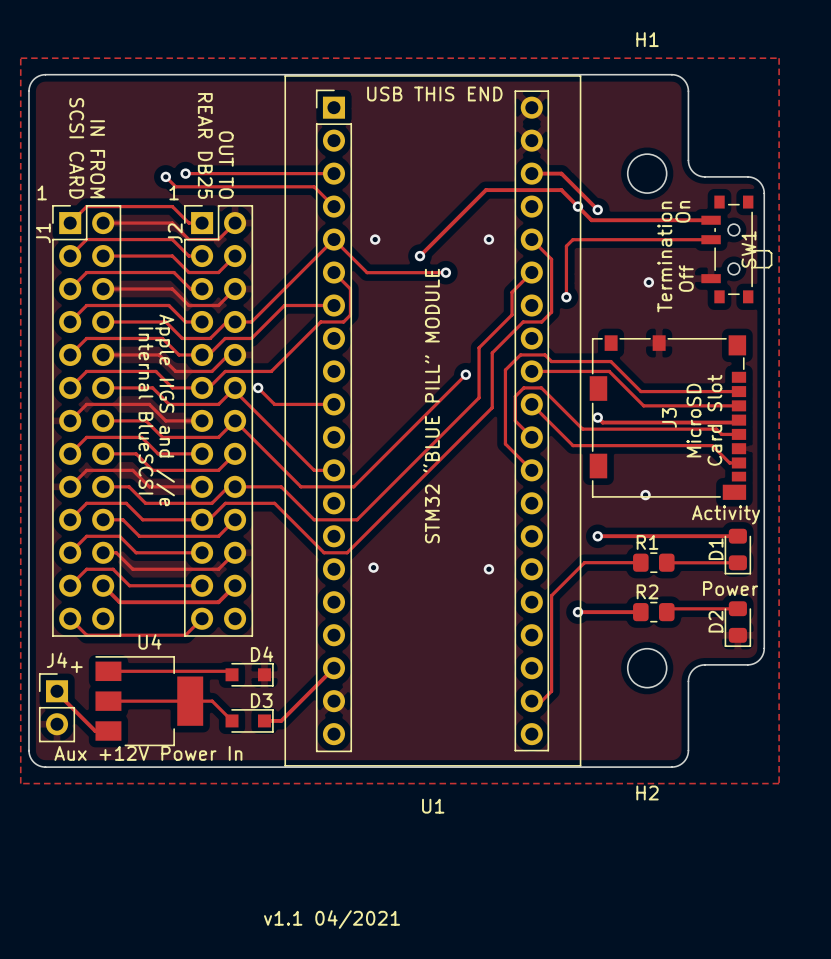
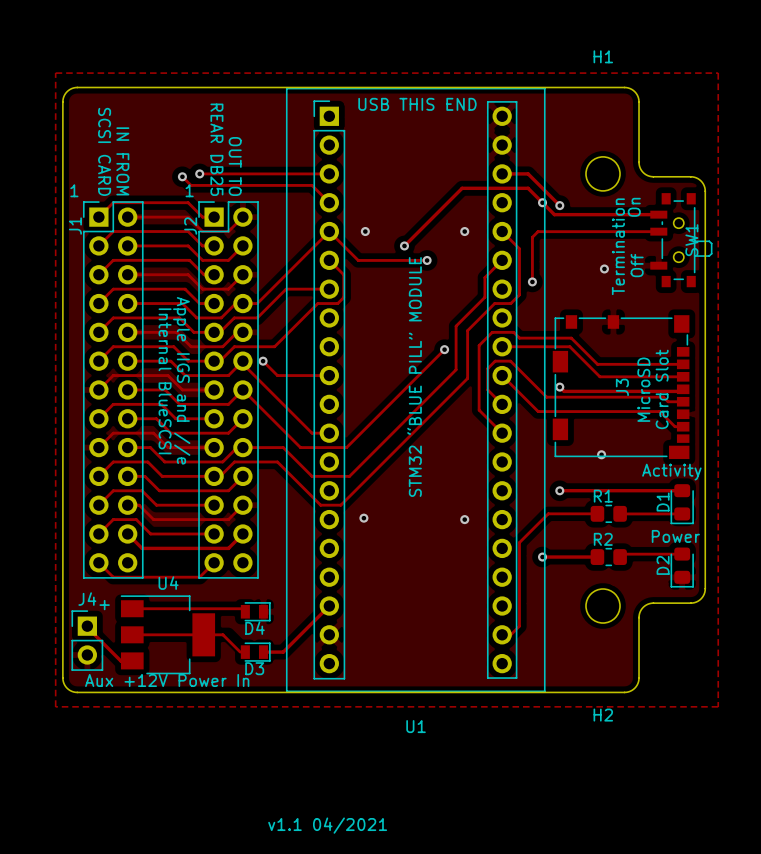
D4 name position: D4 (262, 654) -> D4 (254, 628)
D4 footprint: [225, 662, 274, 687] -> [240, 602, 271, 622]
D3 name position: D3 (261, 700) -> D3 (254, 668)
D3 footprint: [225, 709, 274, 733] -> [240, 642, 271, 662]

